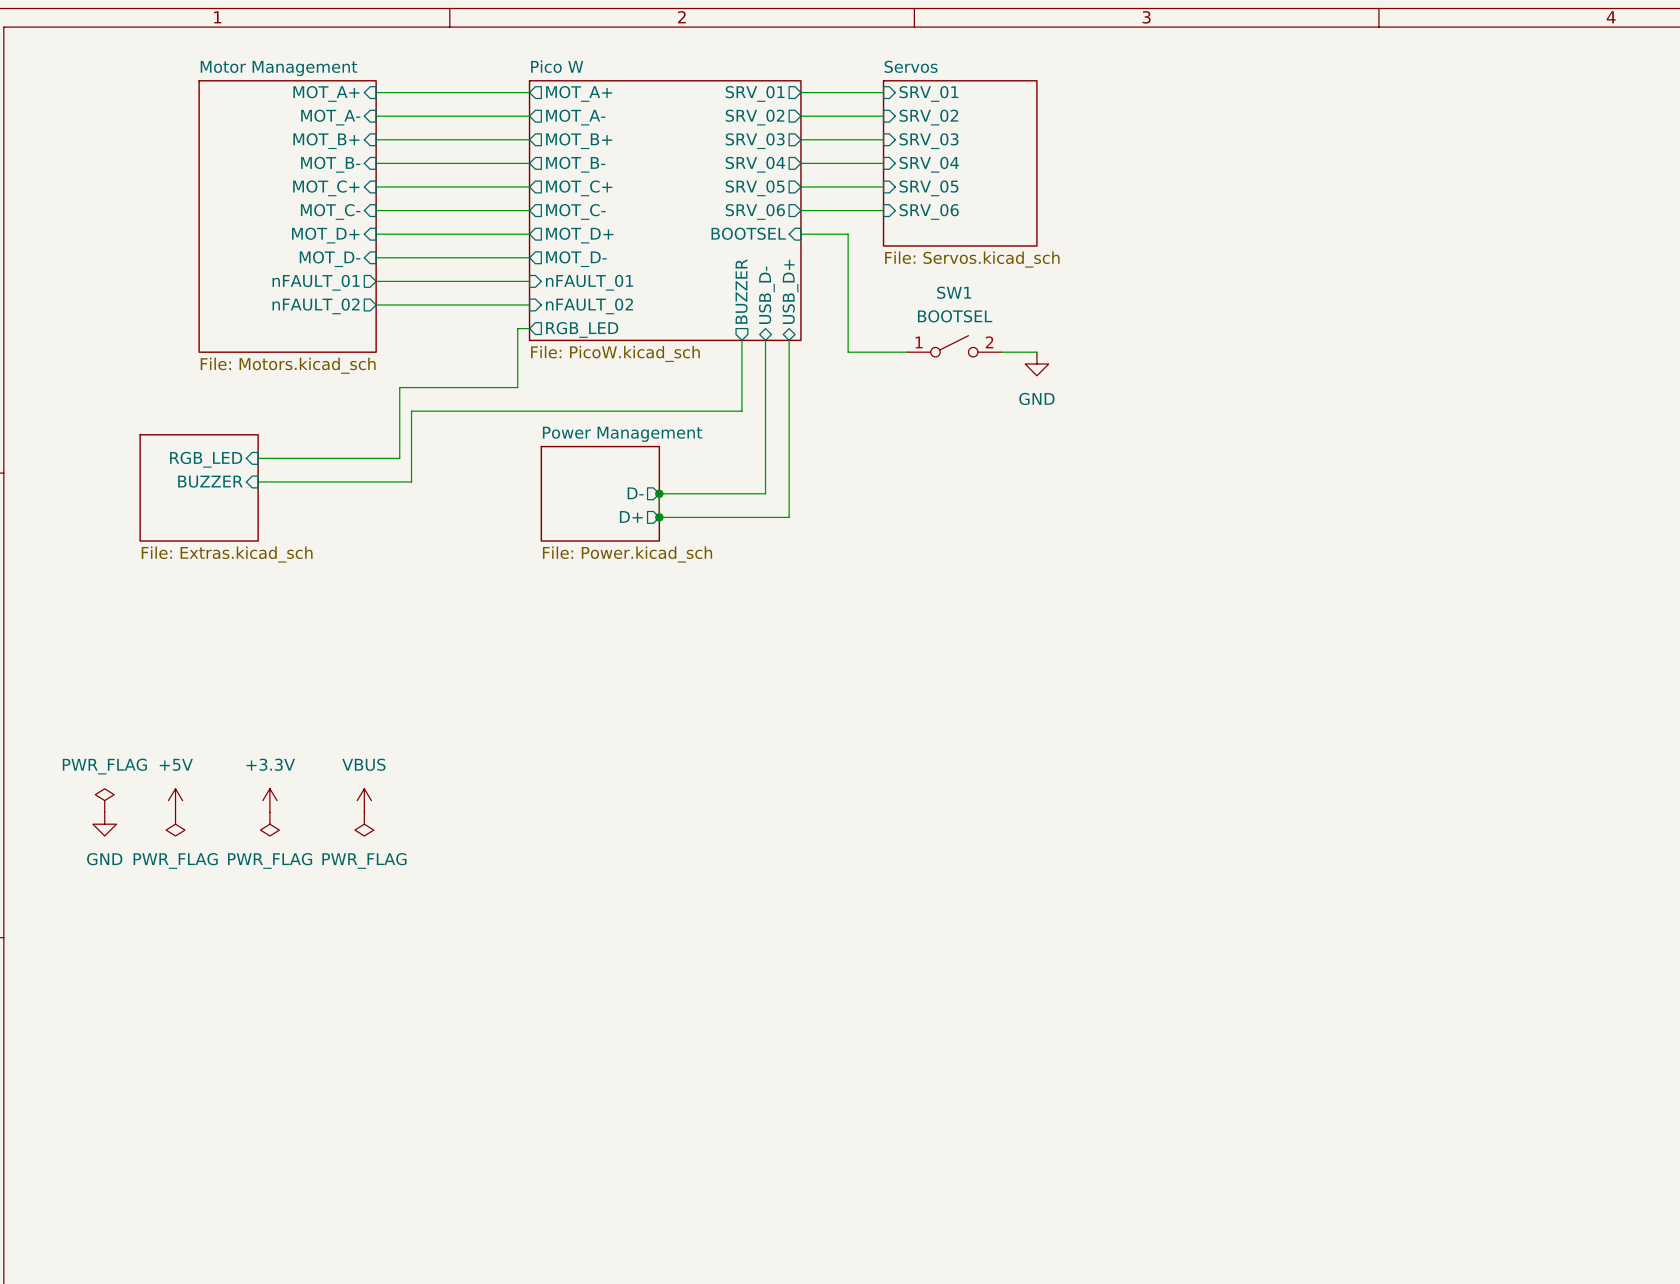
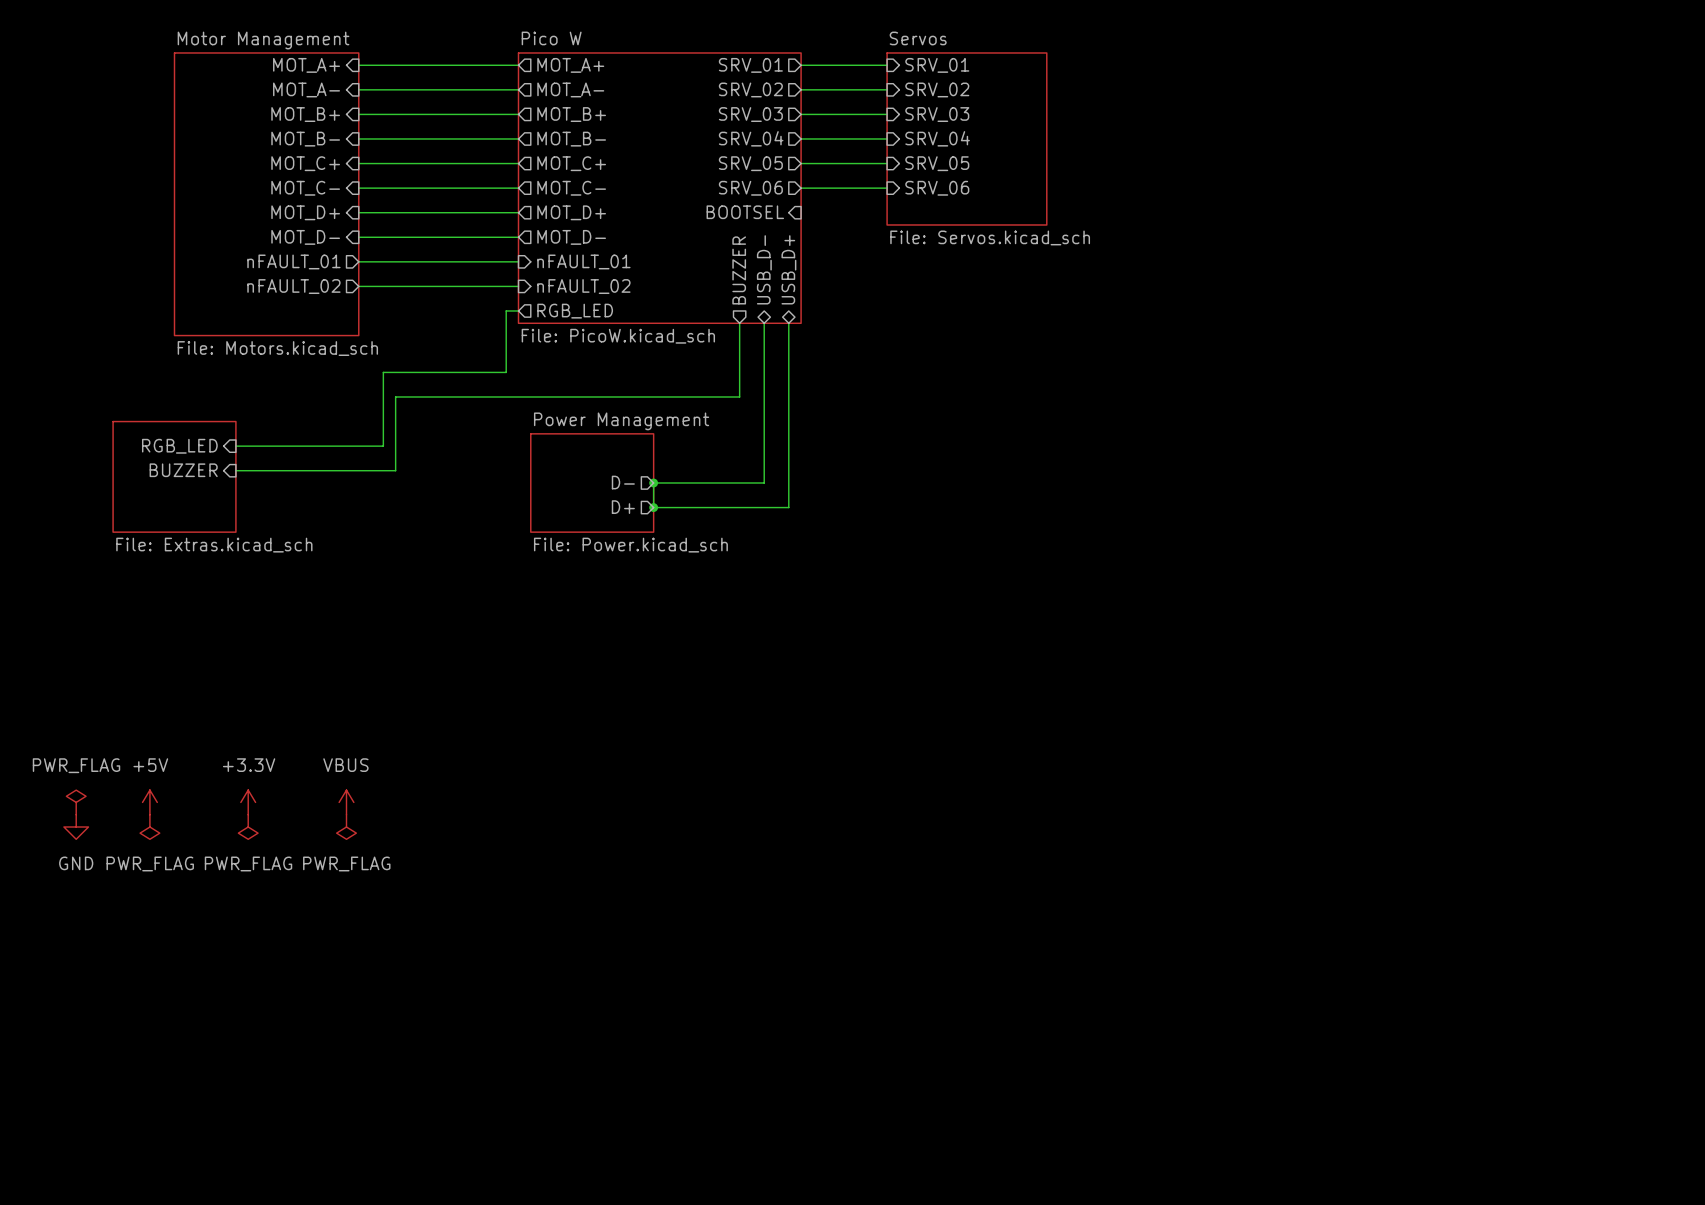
wire: (800, 234) (848, 234) (848, 352) (907, 352) -> none
SW1: BOOTSEL (954, 346) -> none
wire: (1001, 352) (1036, 352) -> none
power symbol: GND (1036, 363) -> none

